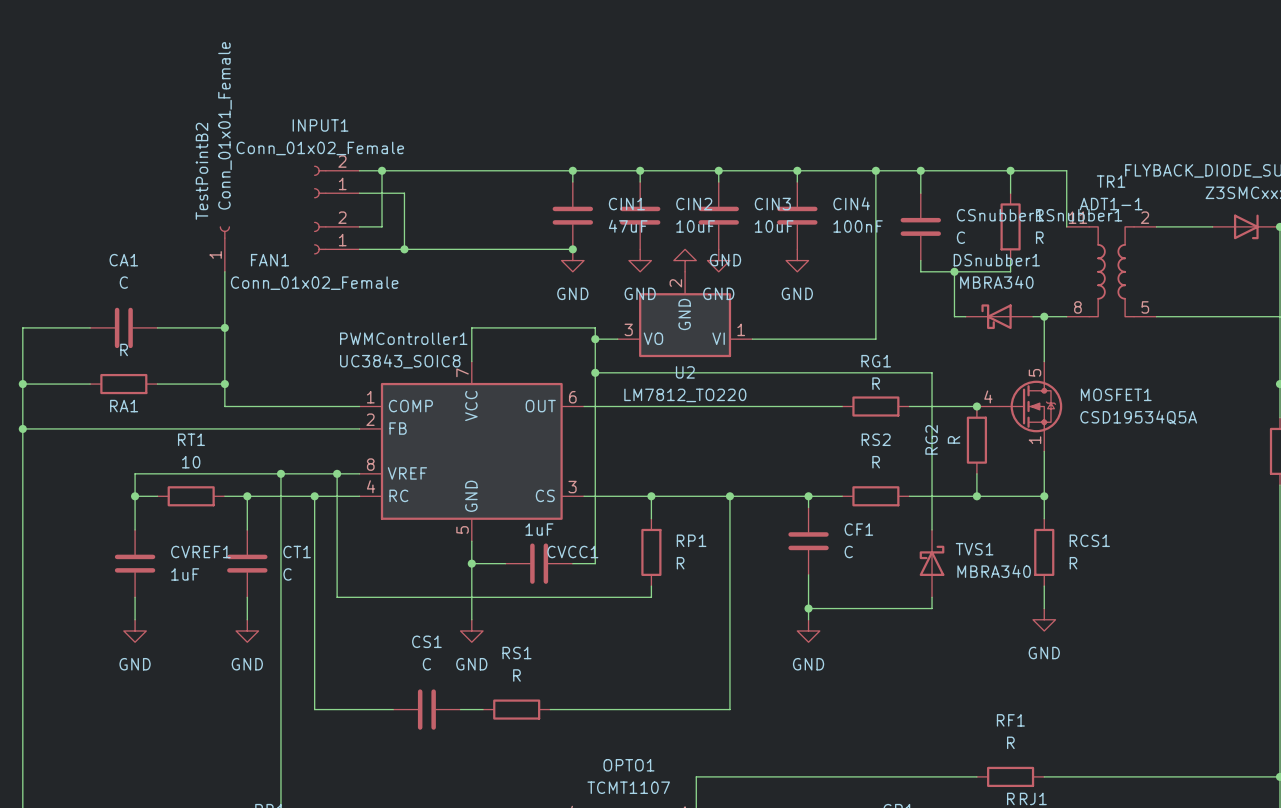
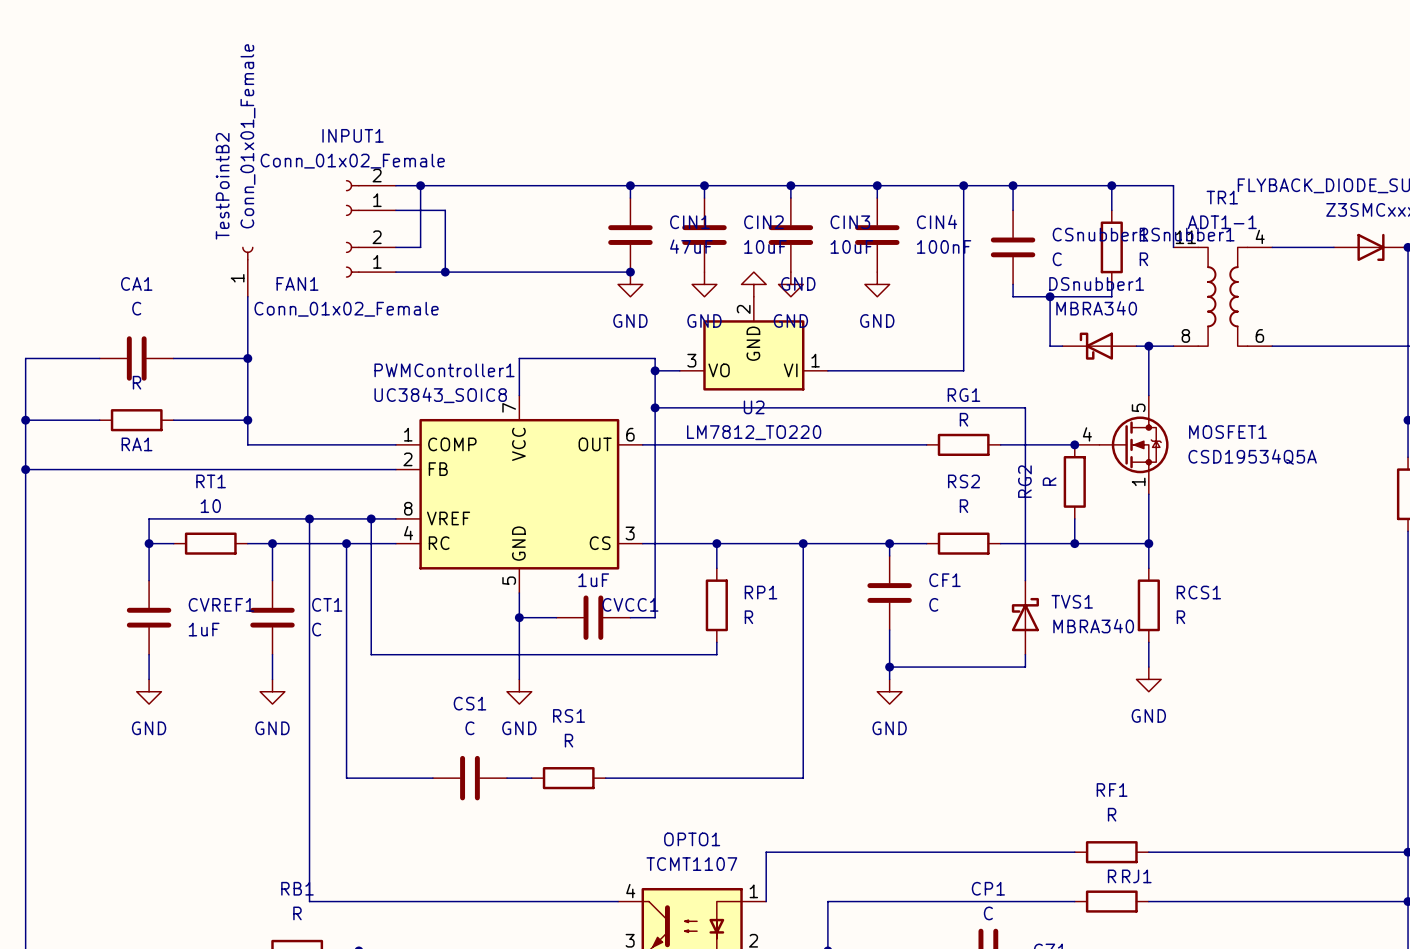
TR1 pin number: 2 (1145, 217) -> 4 (1260, 236)
TR1 pin number: 5 (1145, 307) -> 6 (1259, 335)

